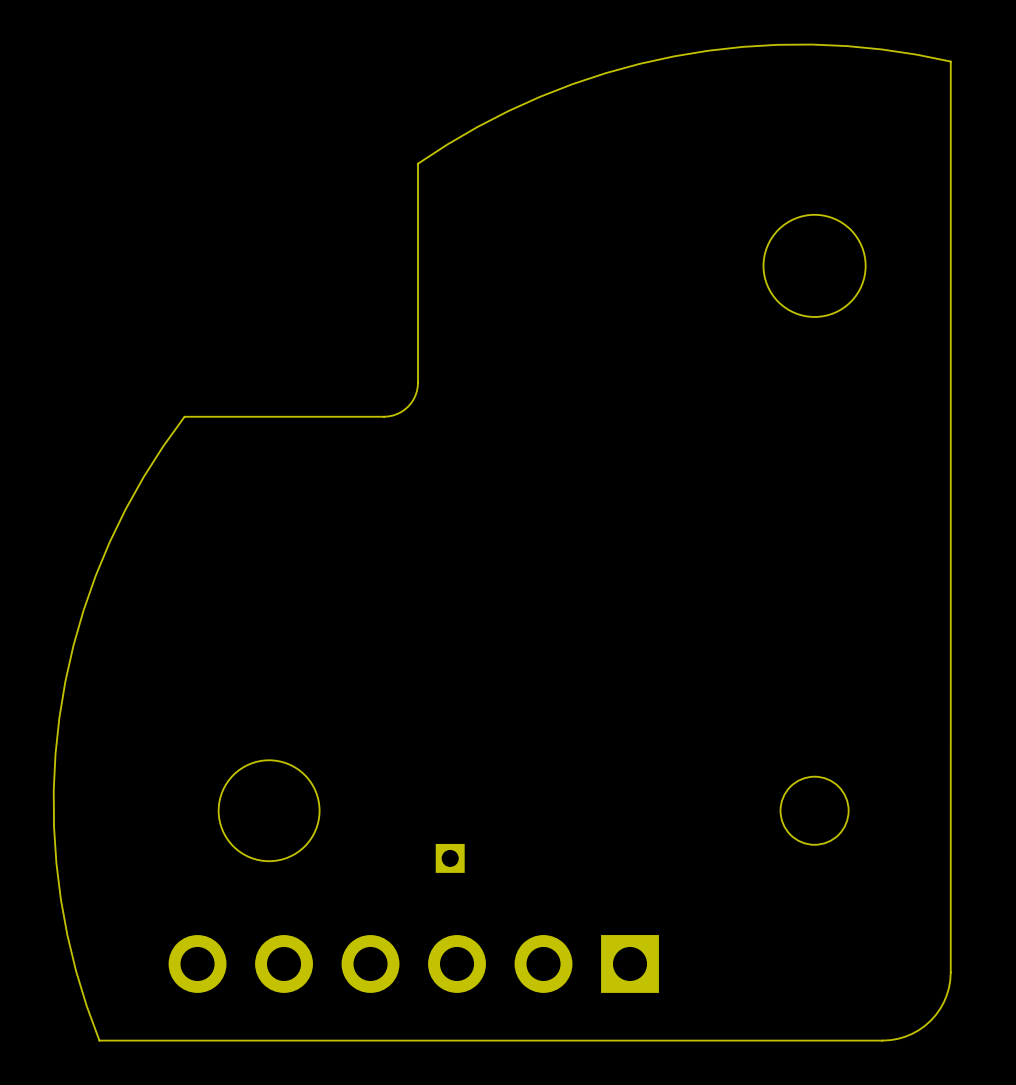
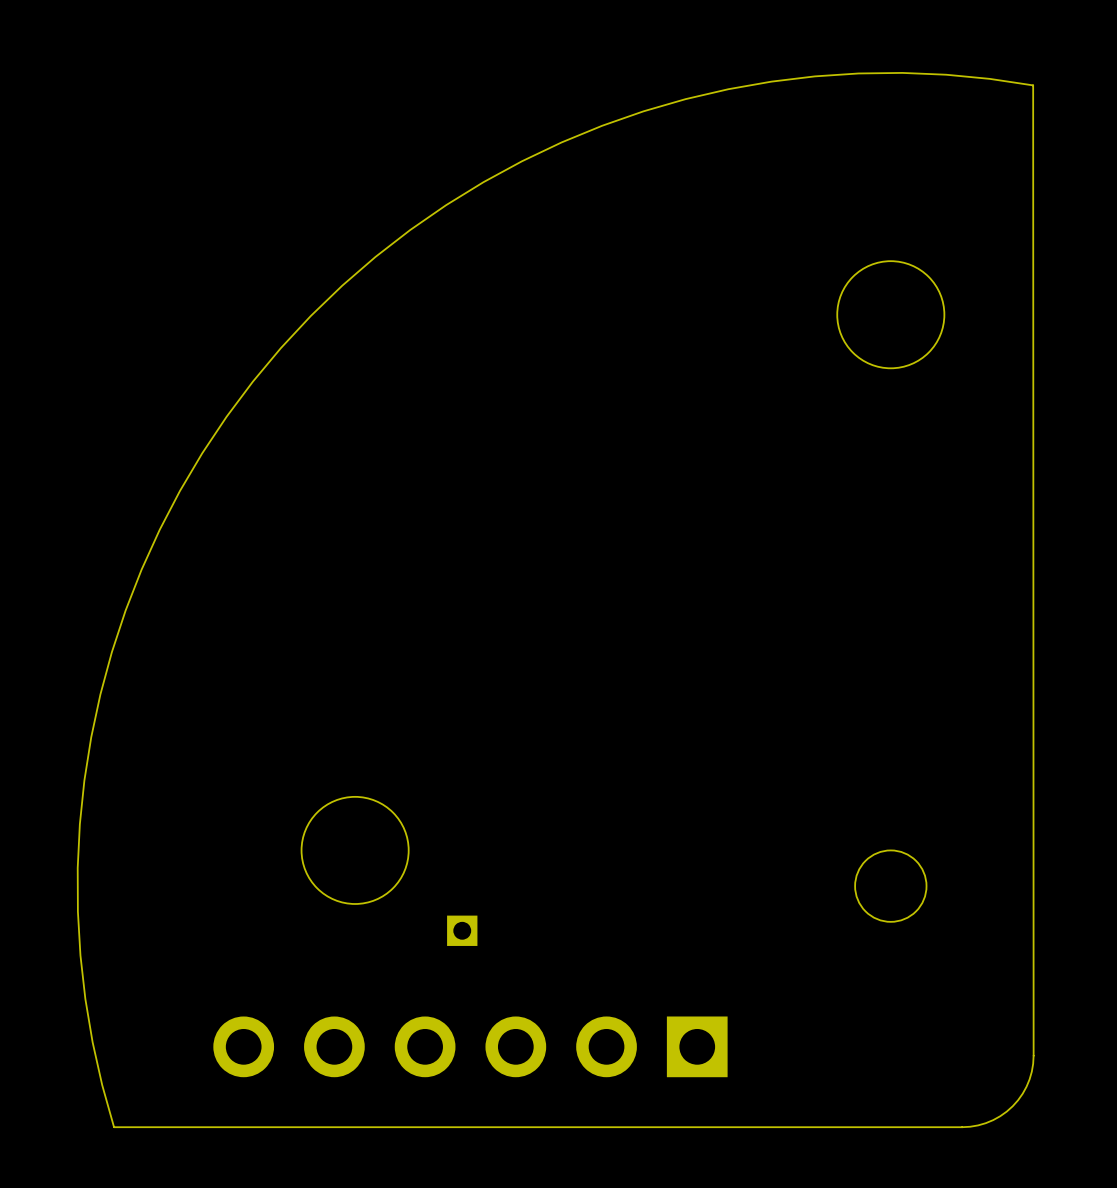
round board edge: none -> [300, 795, 410, 905]
round board edge: [217, 759, 321, 863] -> none
part position: (450, 858) -> (462, 930)
board edge: (950, 972) (950, 61) (916, 54) (847, 46) (777, 44) (742, 46) (673, 56) (639, 63) (572, 84) (508, 111) (477, 127) (418, 163) (418, 382) (413, 399) (404, 409) (396, 414) (383, 416) (184, 416) (163, 446) (125, 509) (109, 542) (83, 610) (65, 681) (55, 753) (54, 826) (60, 899) (76, 971) (99, 1040) -> (1033, 1055) (1033, 85) (946, 74) (902, 72) (814, 76) (728, 89) (643, 111) (561, 142) (483, 182) (410, 230) (375, 256) (310, 316) (252, 381) (202, 453) (159, 529) (141, 569) (111, 652) (91, 737) (79, 824) (77, 911) (85, 999) (92, 1042) (114, 1127) (140, 1127)

